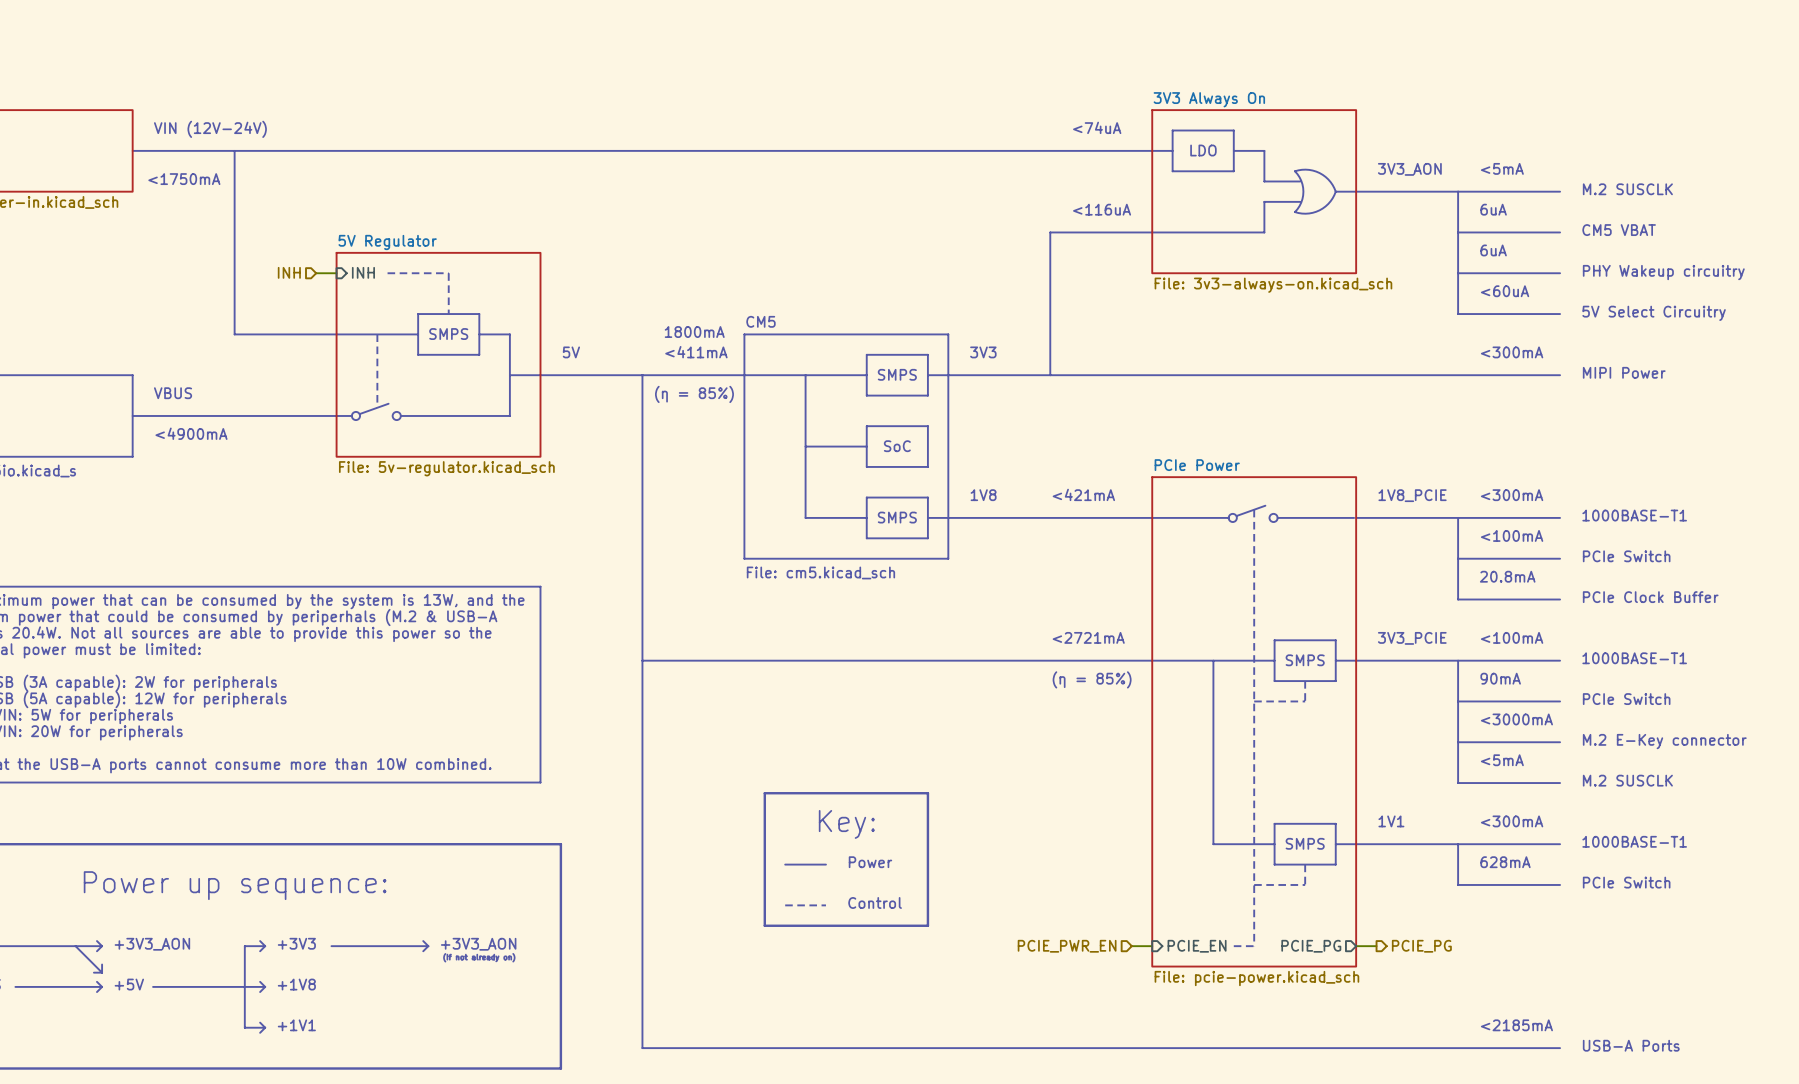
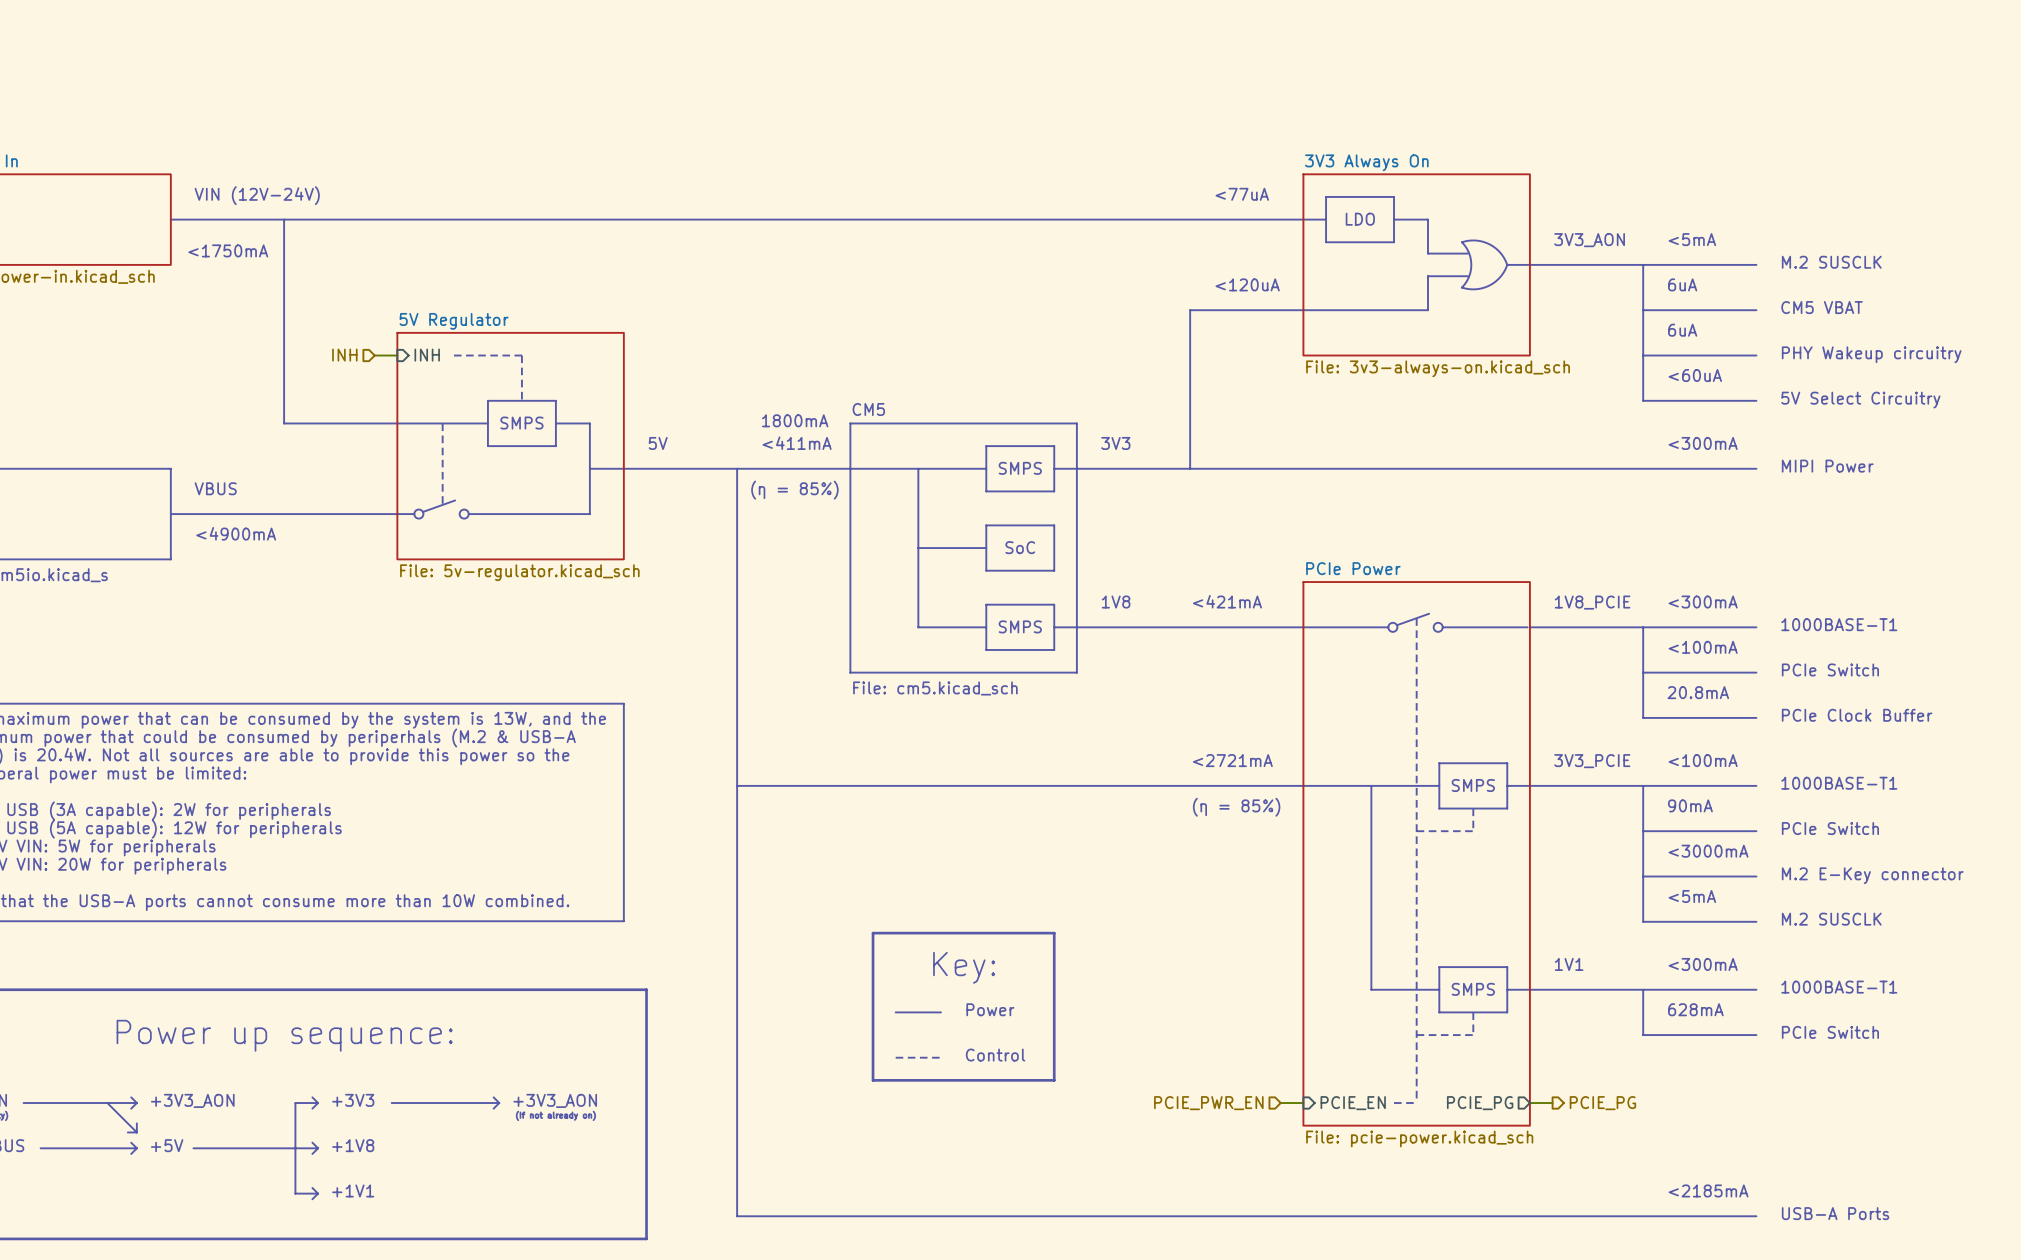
text: <74uA (1097, 127) -> <77uA (1242, 194)
text: <116uA (1102, 209) -> <120uA (1247, 284)

